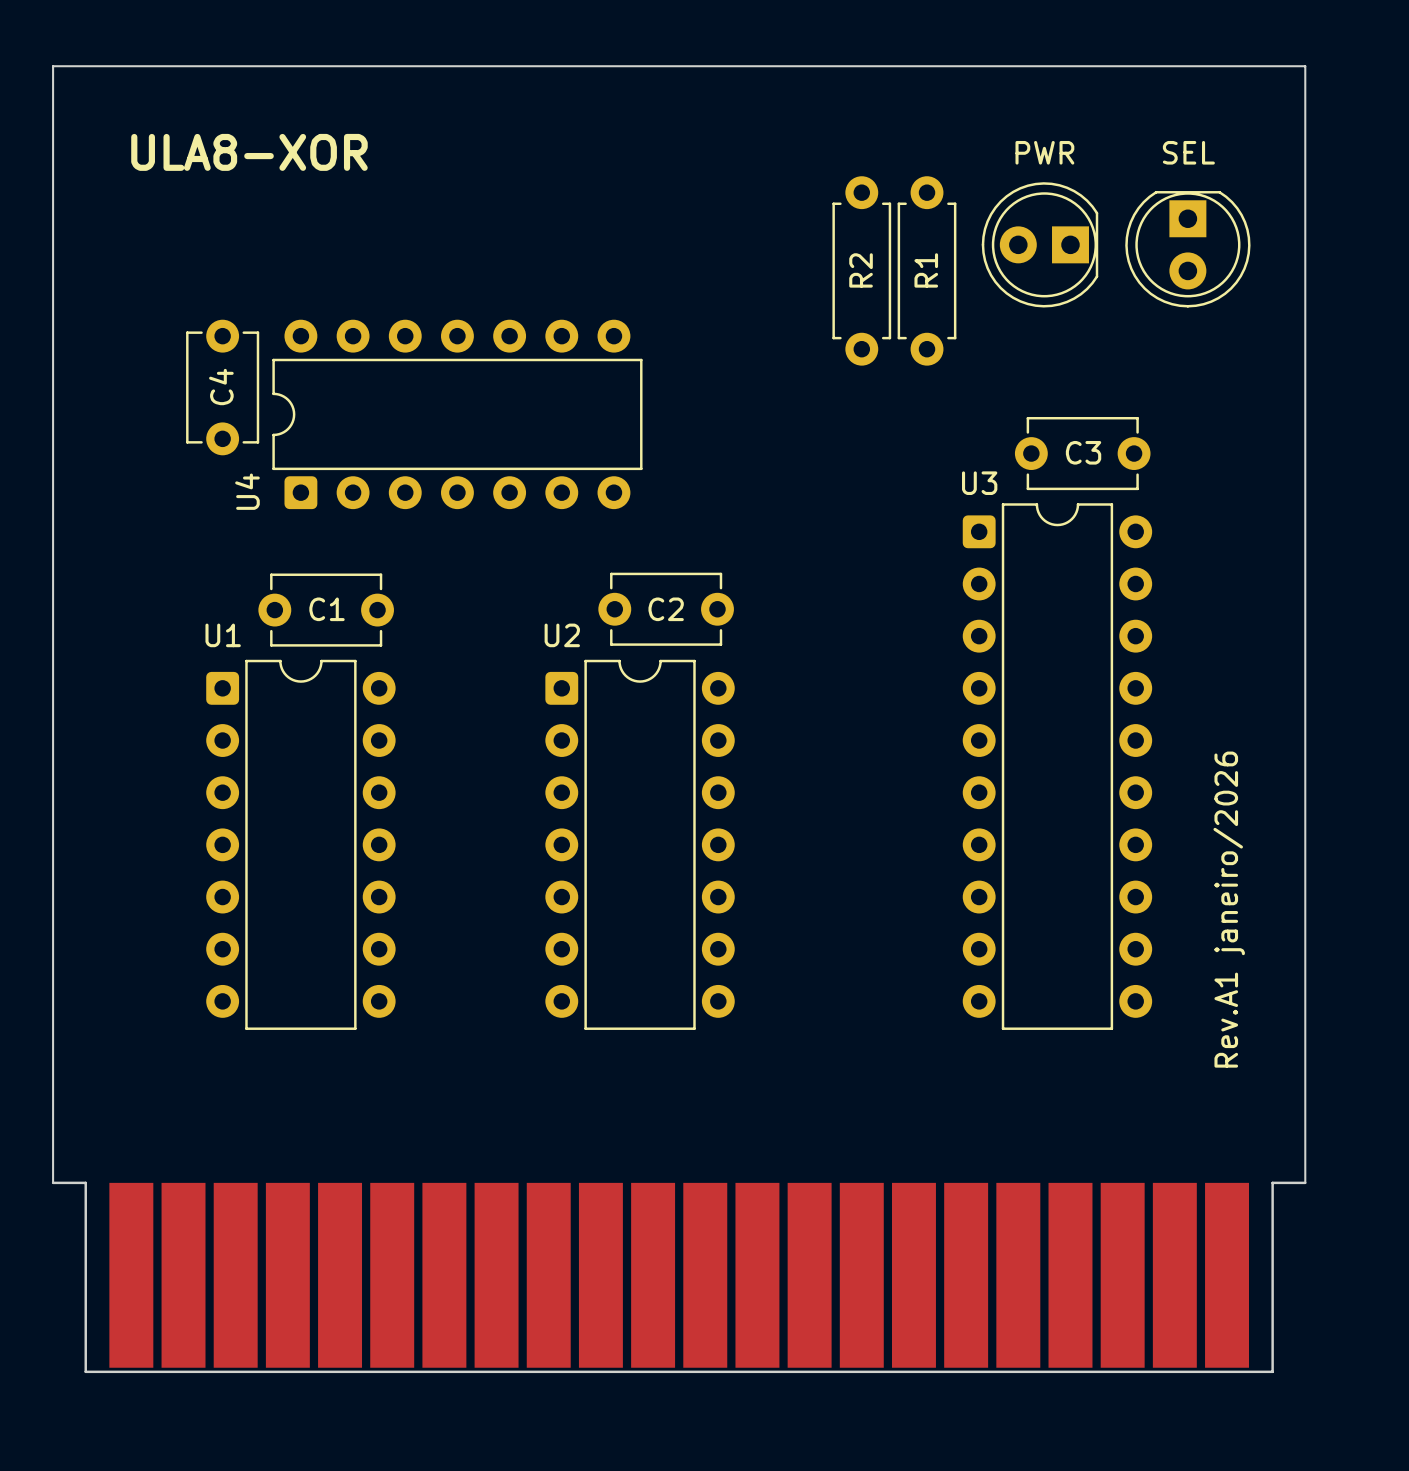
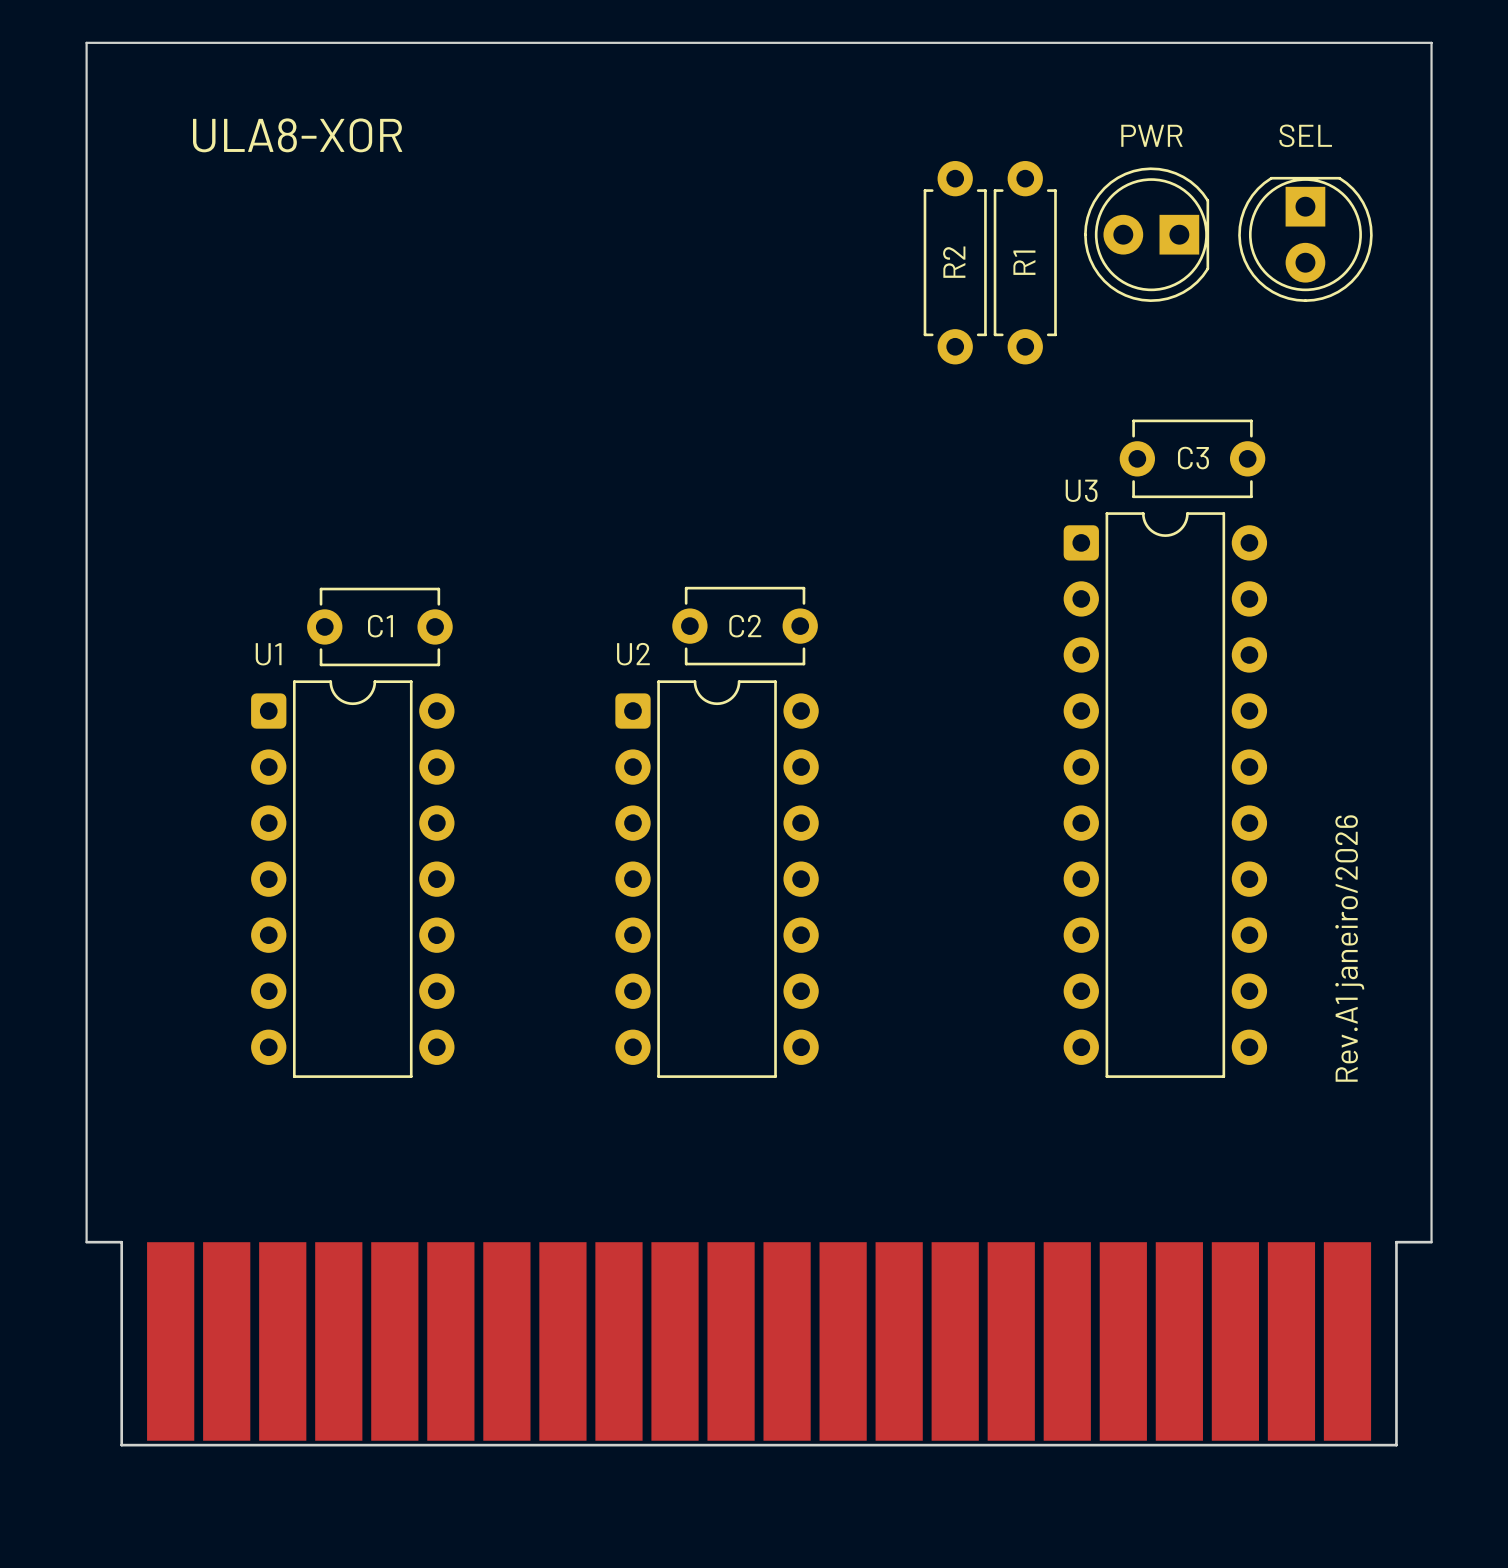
C4: (222, 387) -> none
U4: (457, 414) -> none

